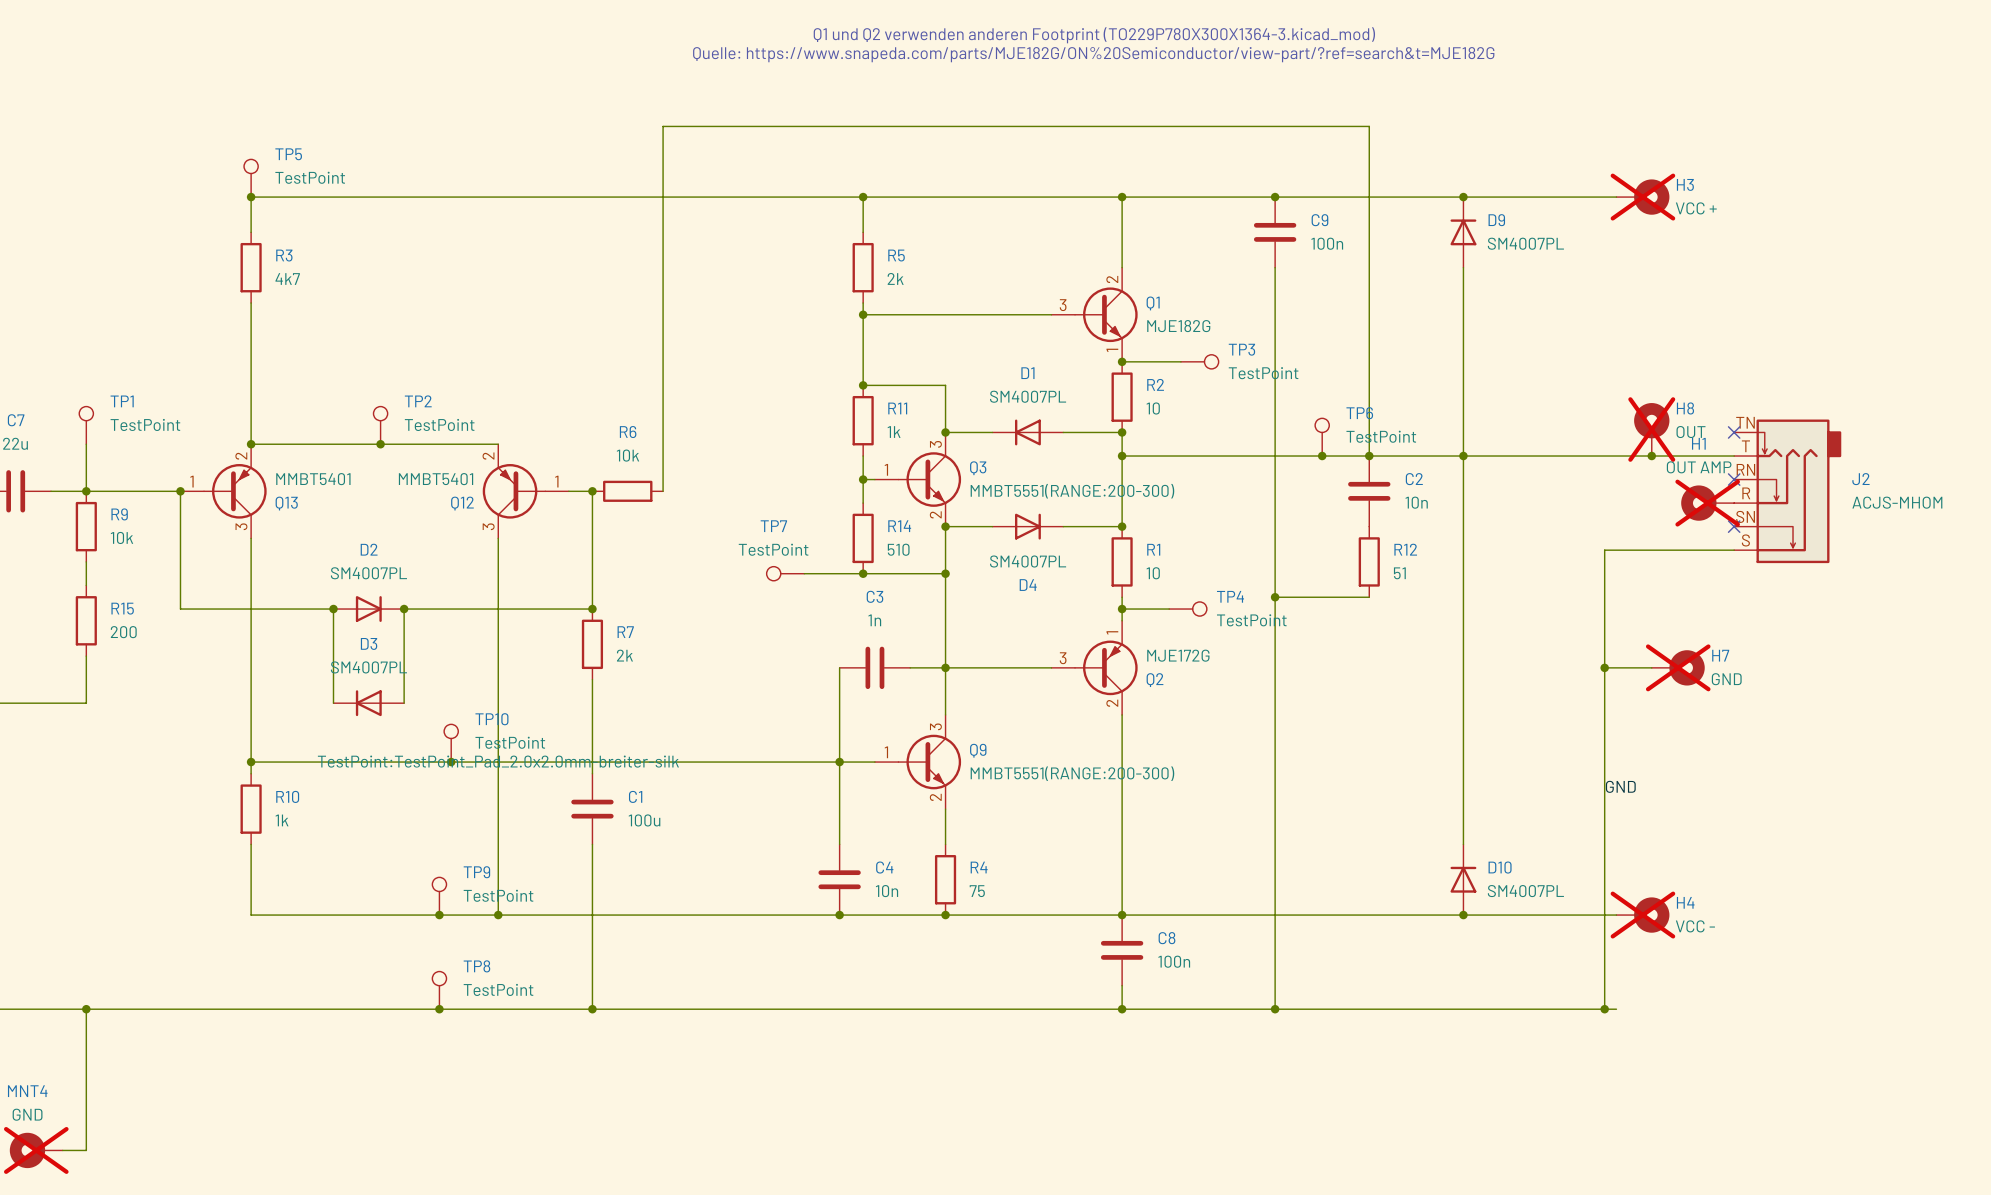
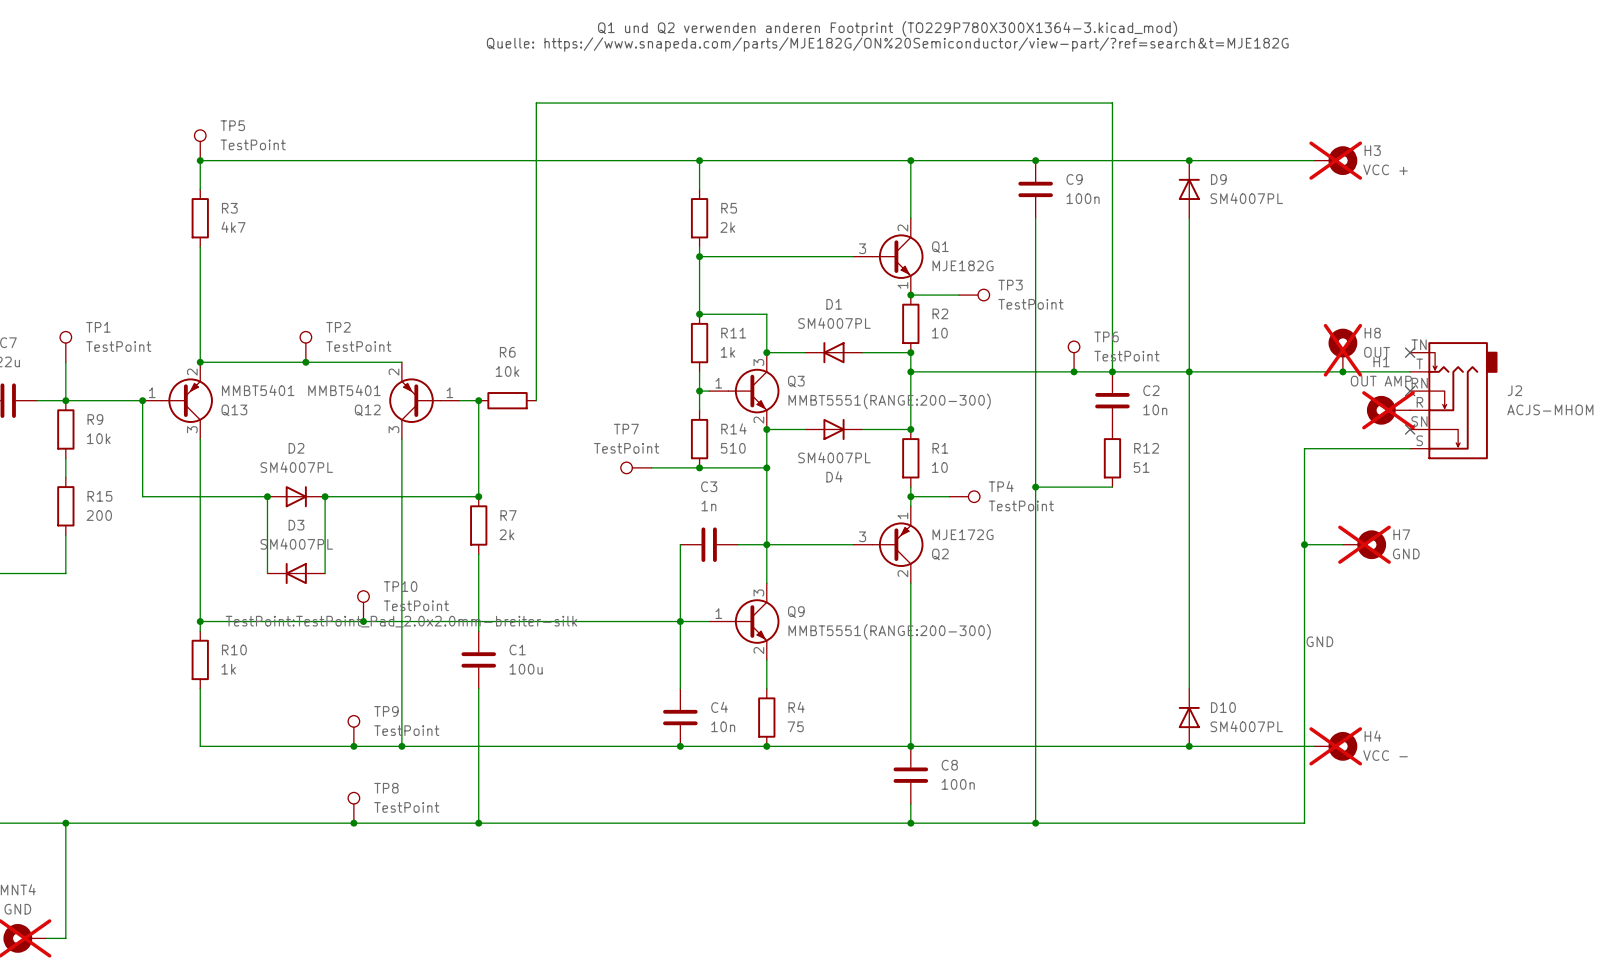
wire: (1604, 1009) (1616, 1009) -> none
junction: (1604, 1009) -> none

